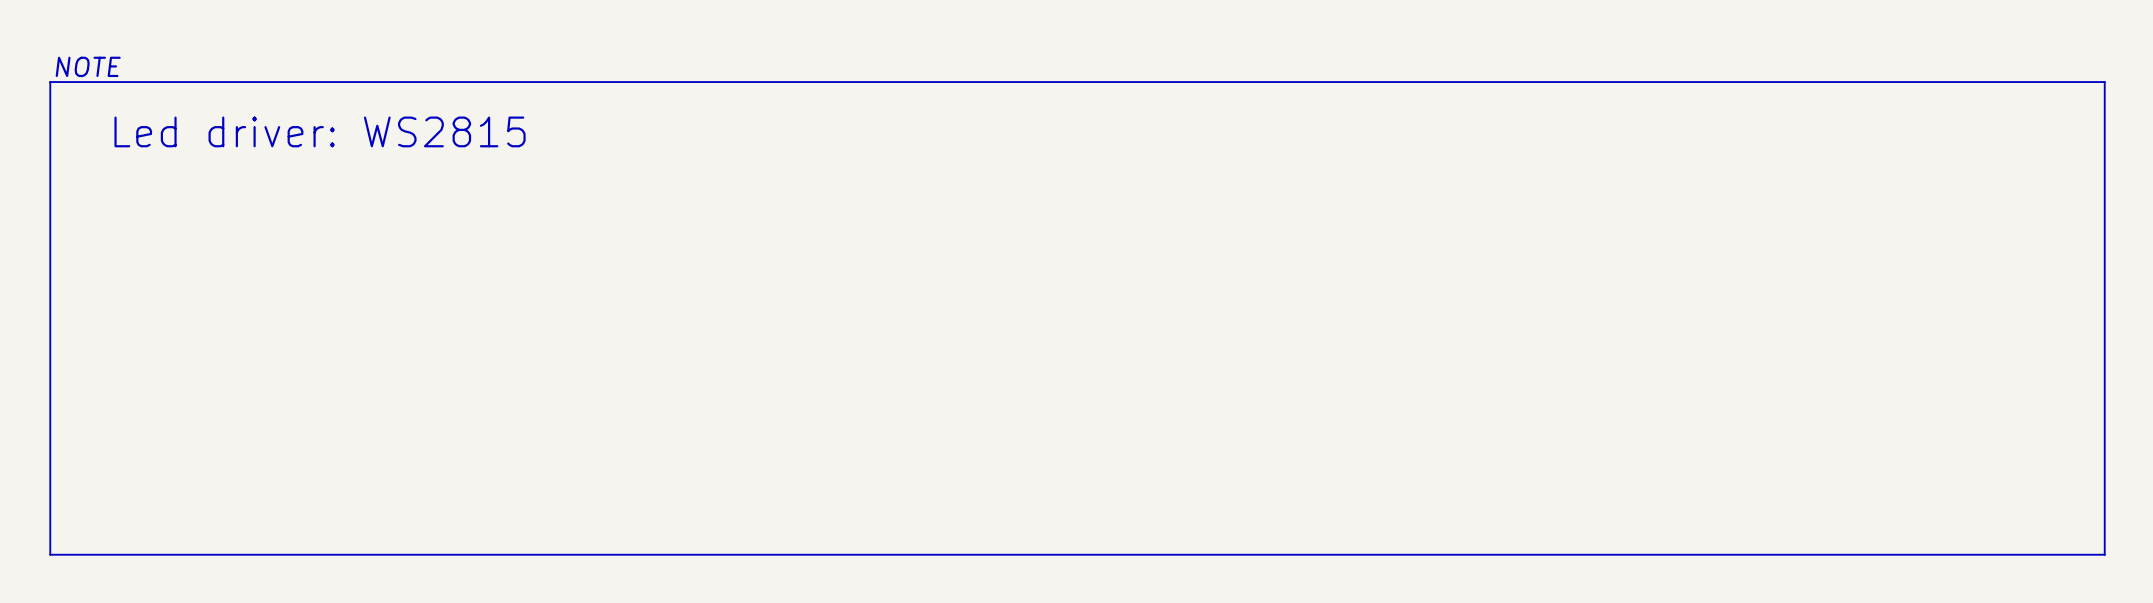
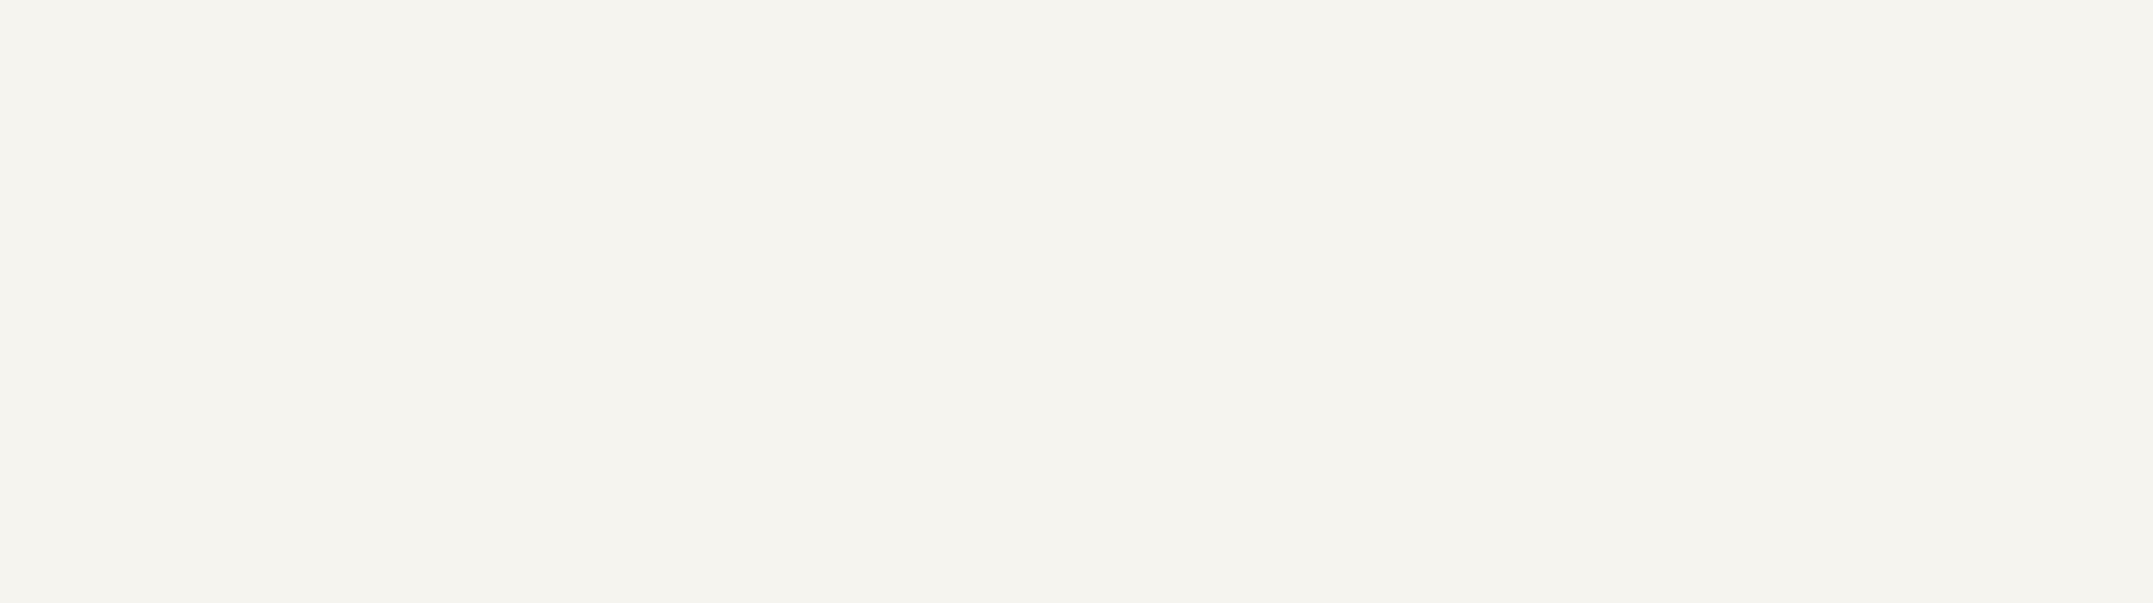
text: NOTE (88, 66) -> none
line: (50, 82) (2104, 82) (2104, 554) (50, 554) (50, 82) -> none
text: Led driver: WS2815 (320, 131) -> none

